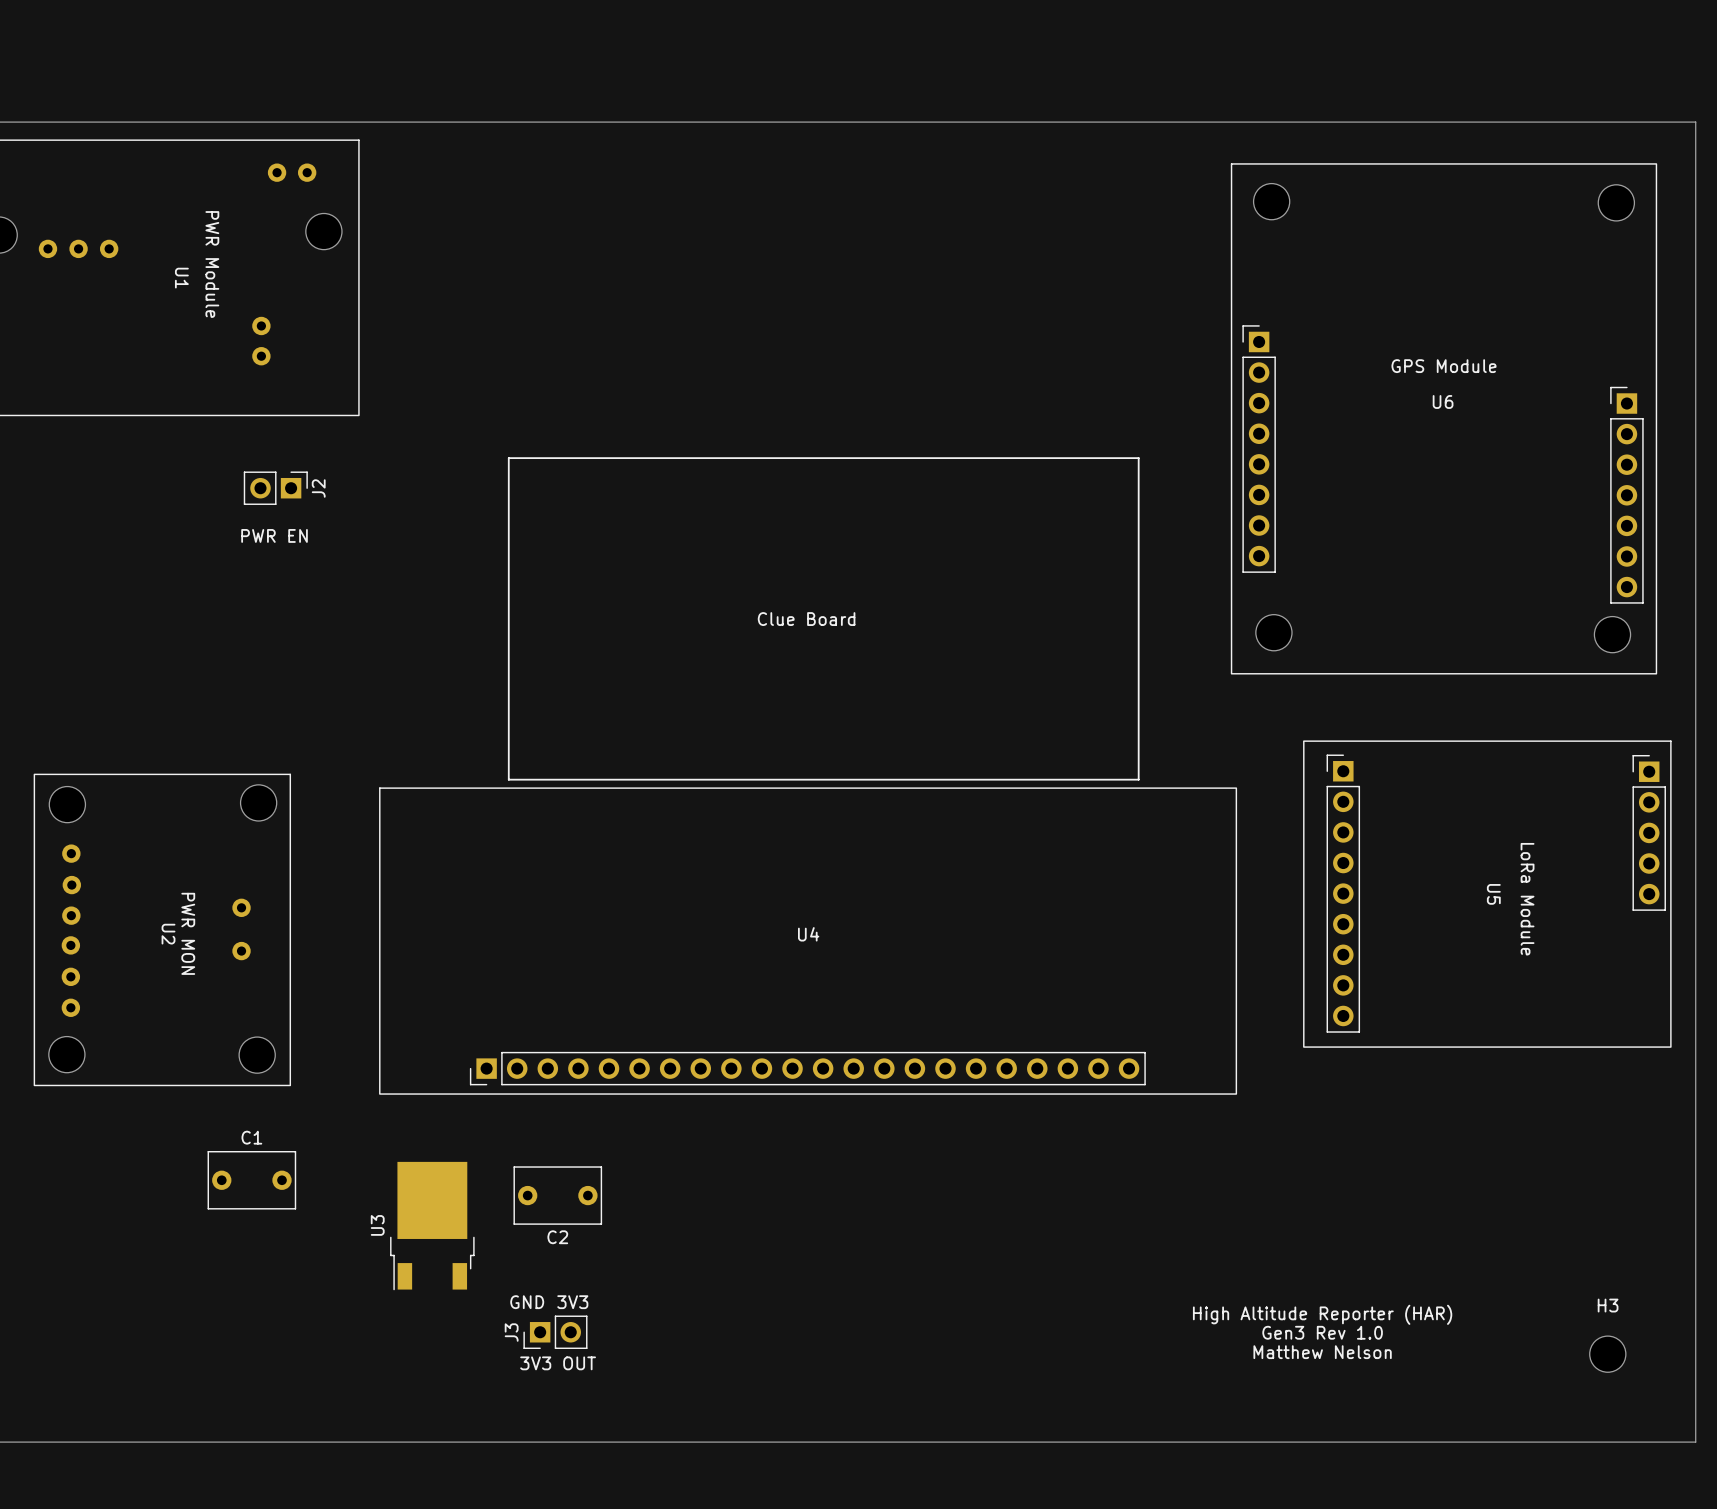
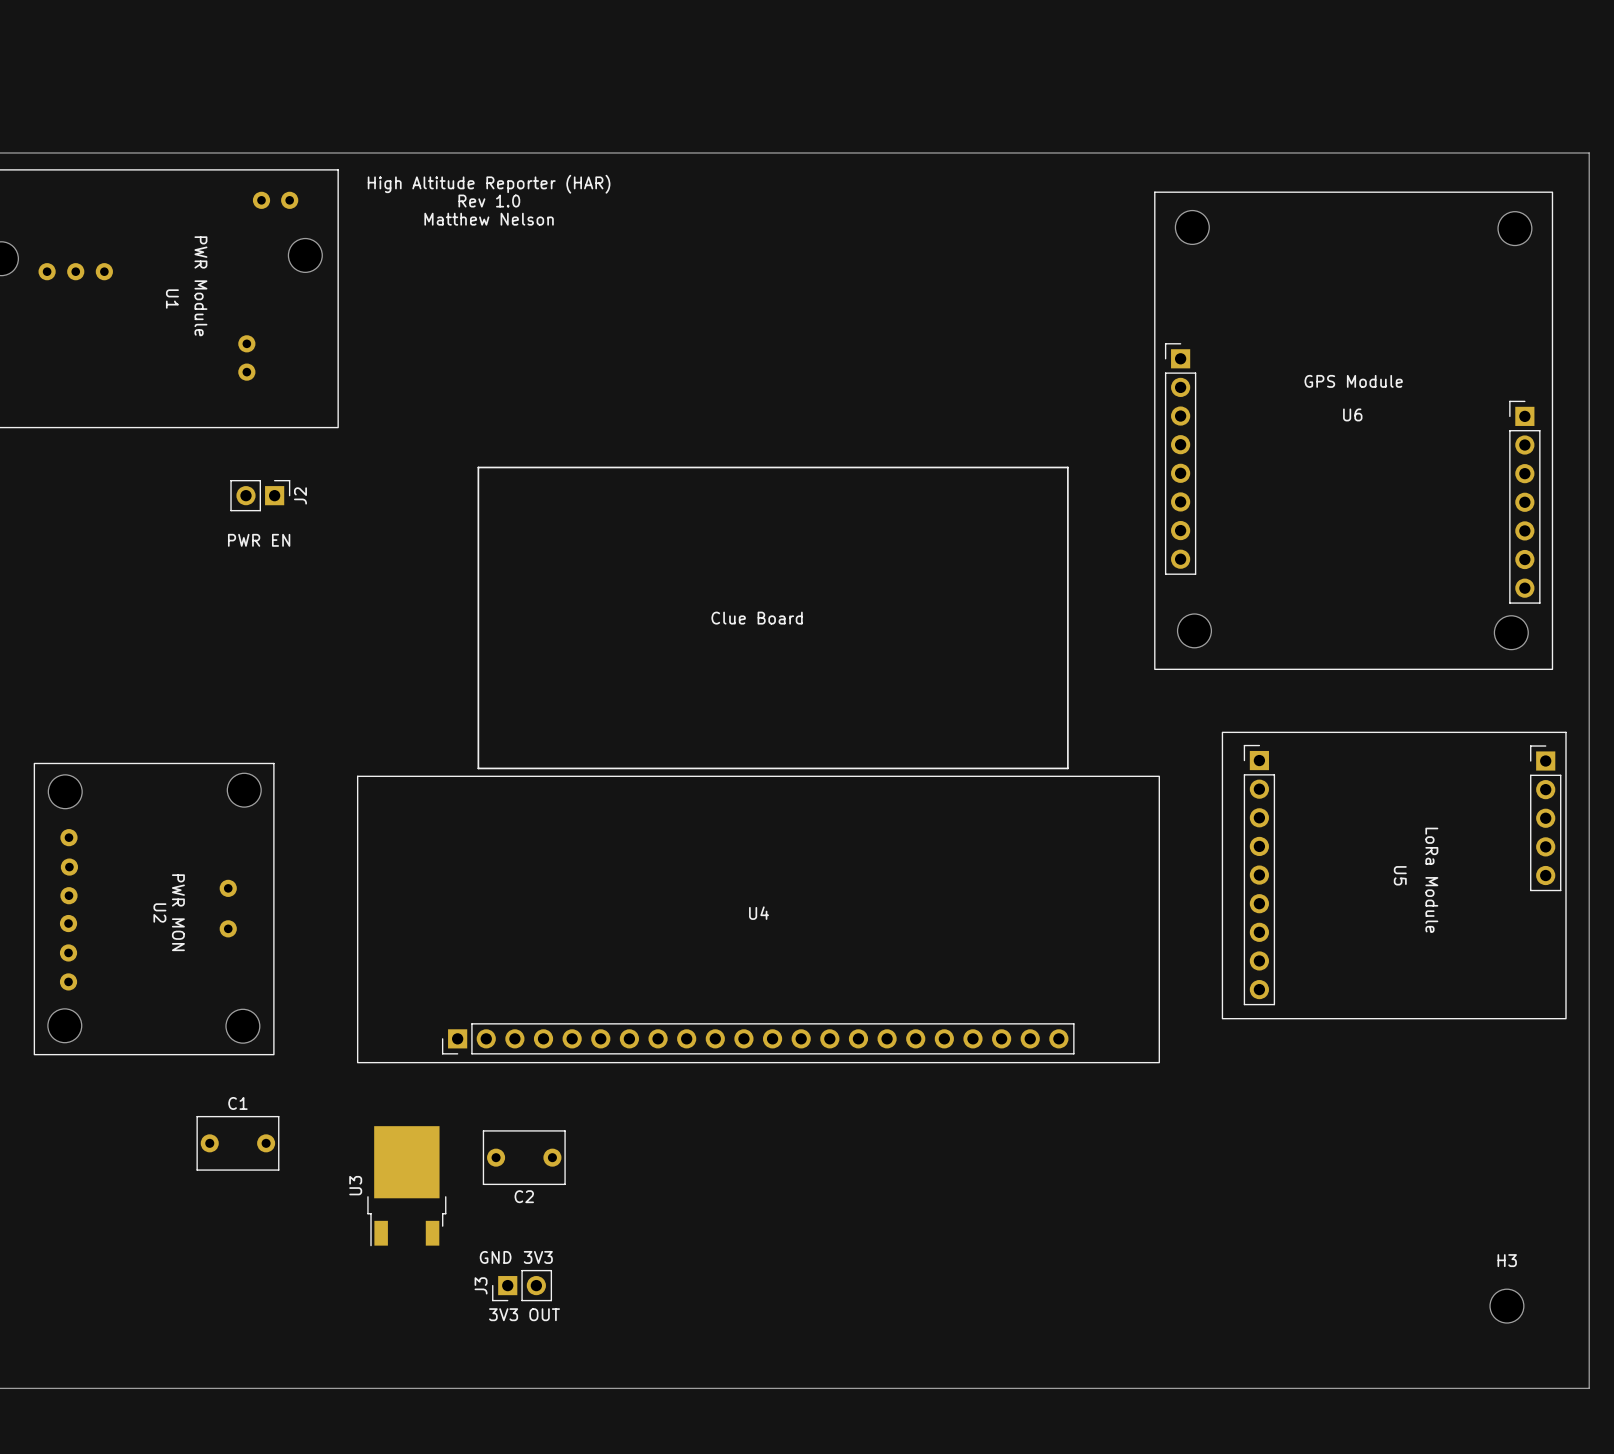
text: none -> High Altitude Reporter (HAR) (489, 184)
text: none -> Rev 1.0 (489, 201)
text: none -> Matthew Nelson (489, 219)
text: High Altitude Reporter (HAR) (1322, 1314) -> none
text: Gen3 Rev 1.0 (1322, 1332) -> none
text: Matthew Nelson (1322, 1352) -> none

